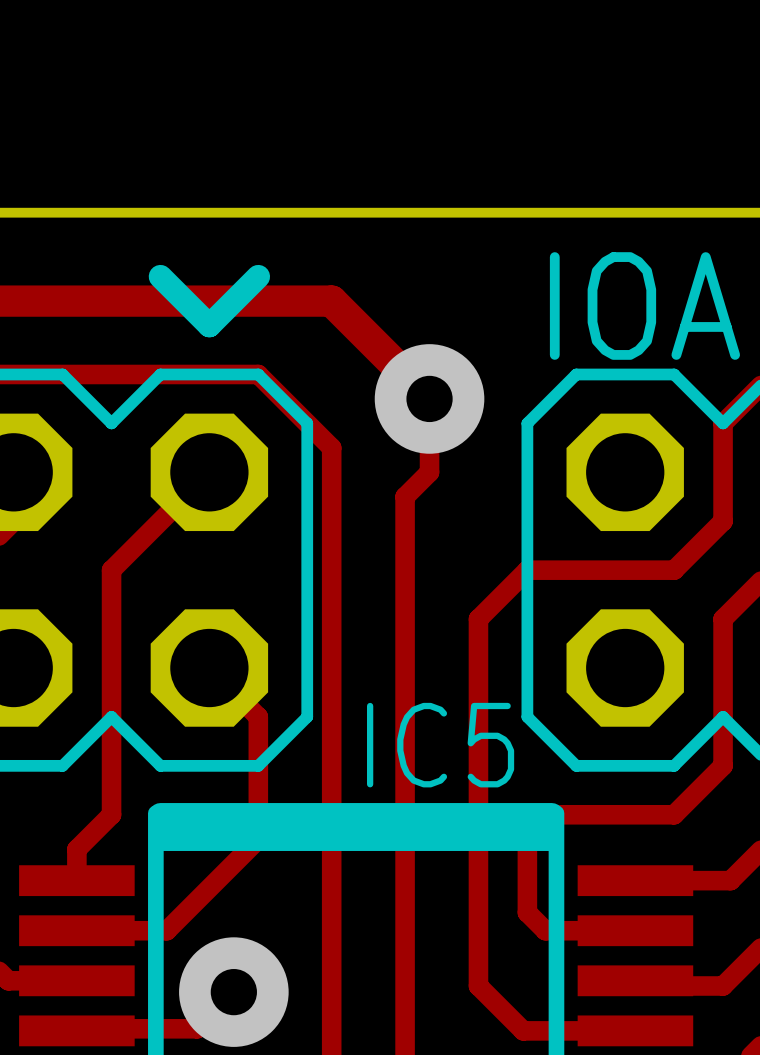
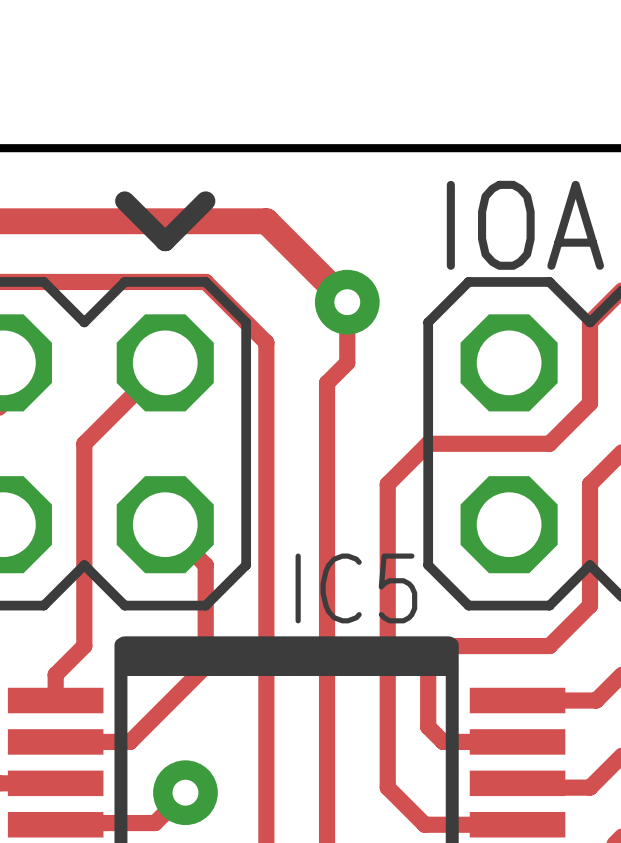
via size: [374, 344, 485, 454] -> [314, 269, 380, 335]
via size: [179, 937, 289, 1047] -> [153, 760, 218, 826]

